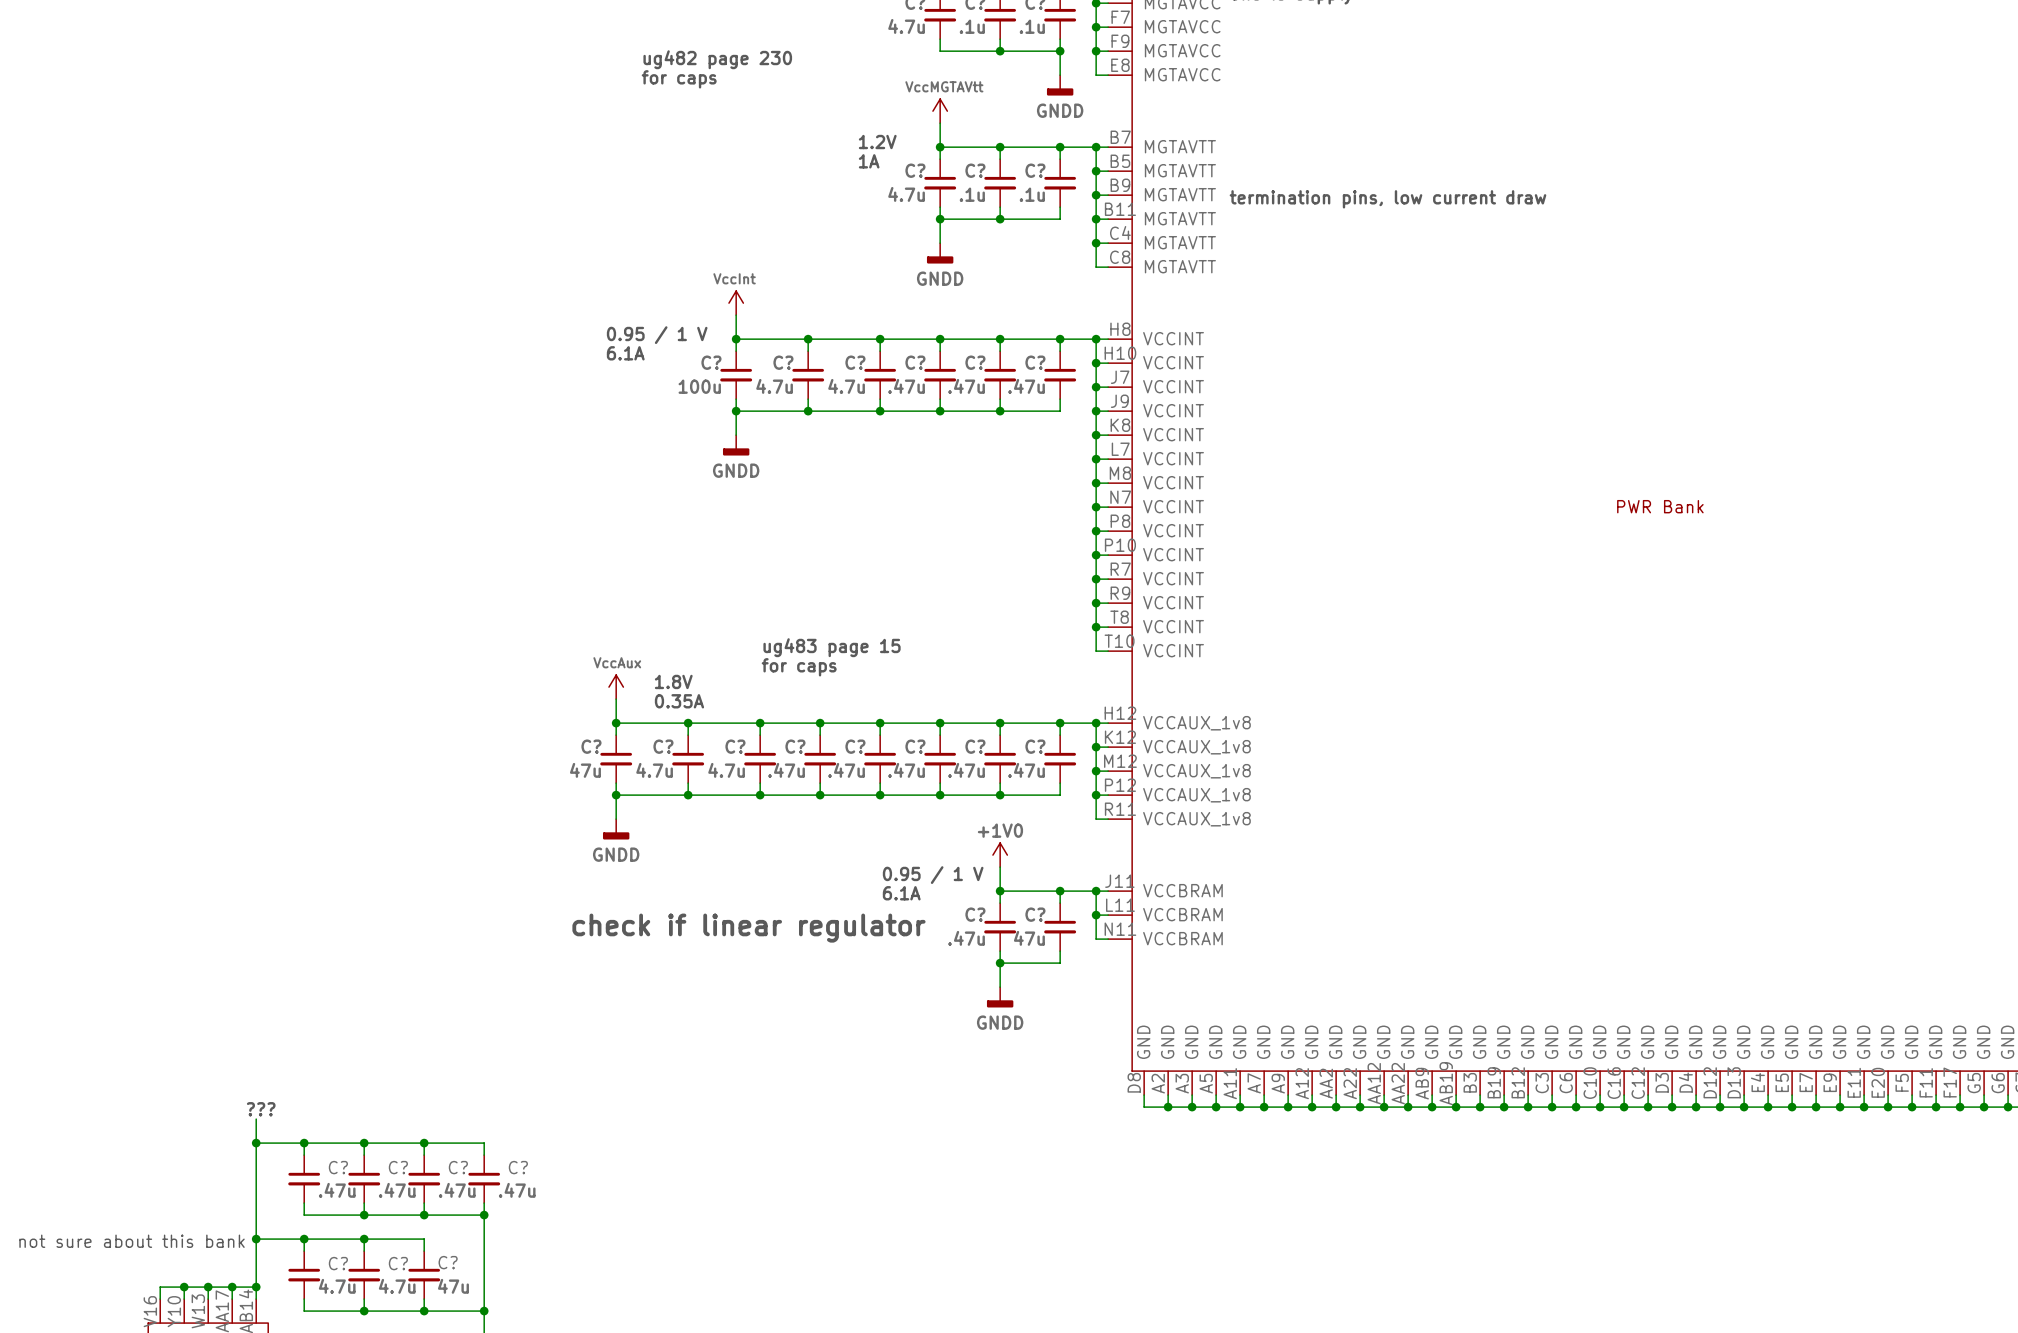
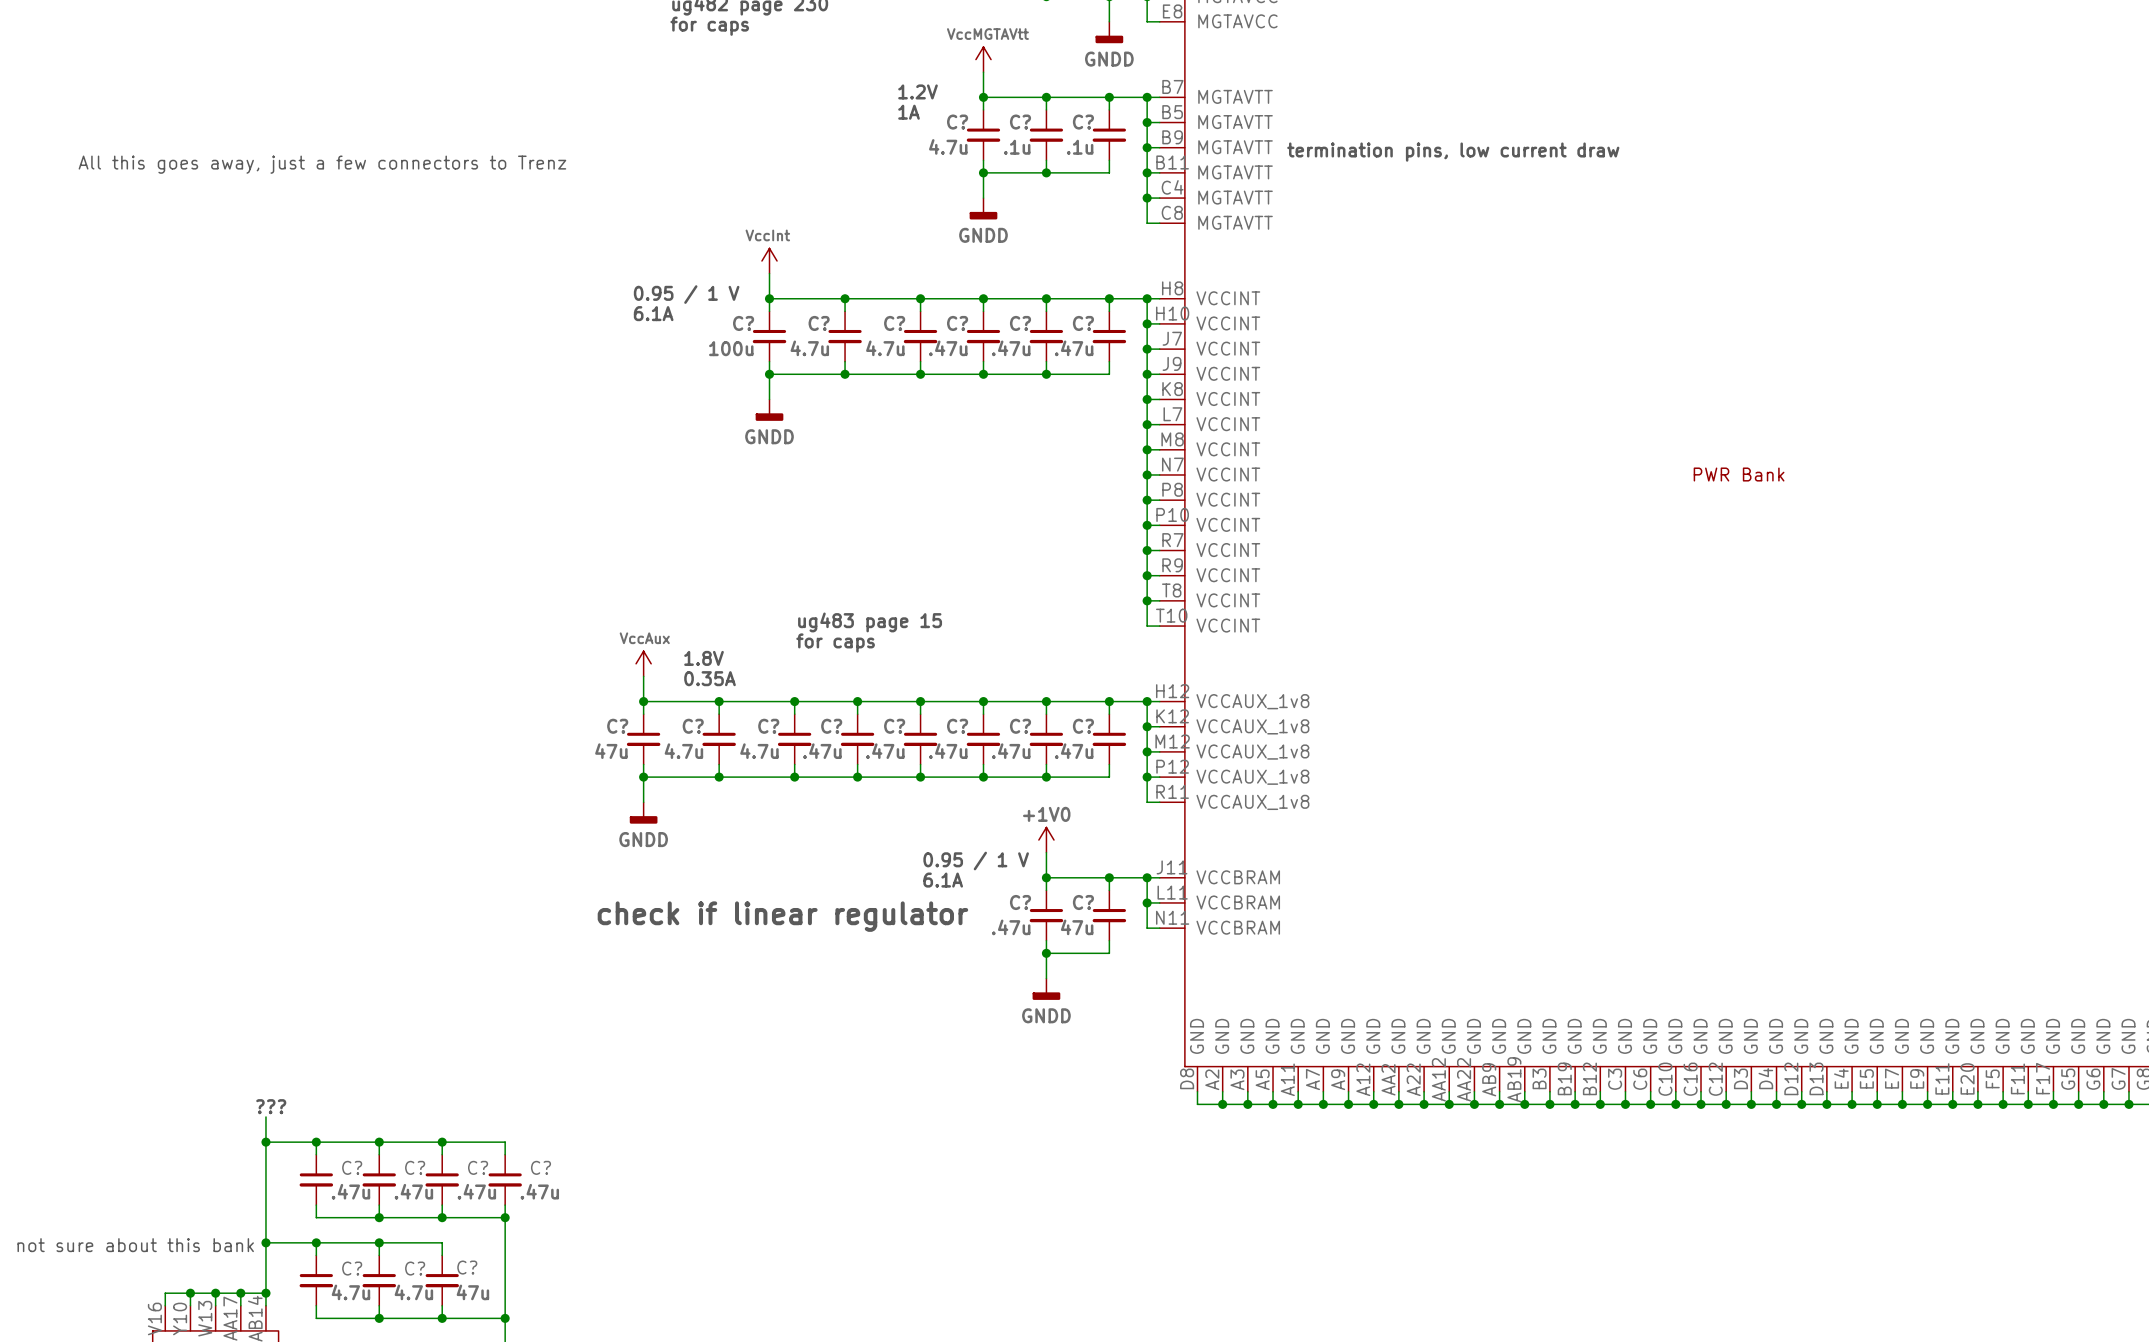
text: none -> All this goes away, just a few connectors to Trenz (322, 164)

